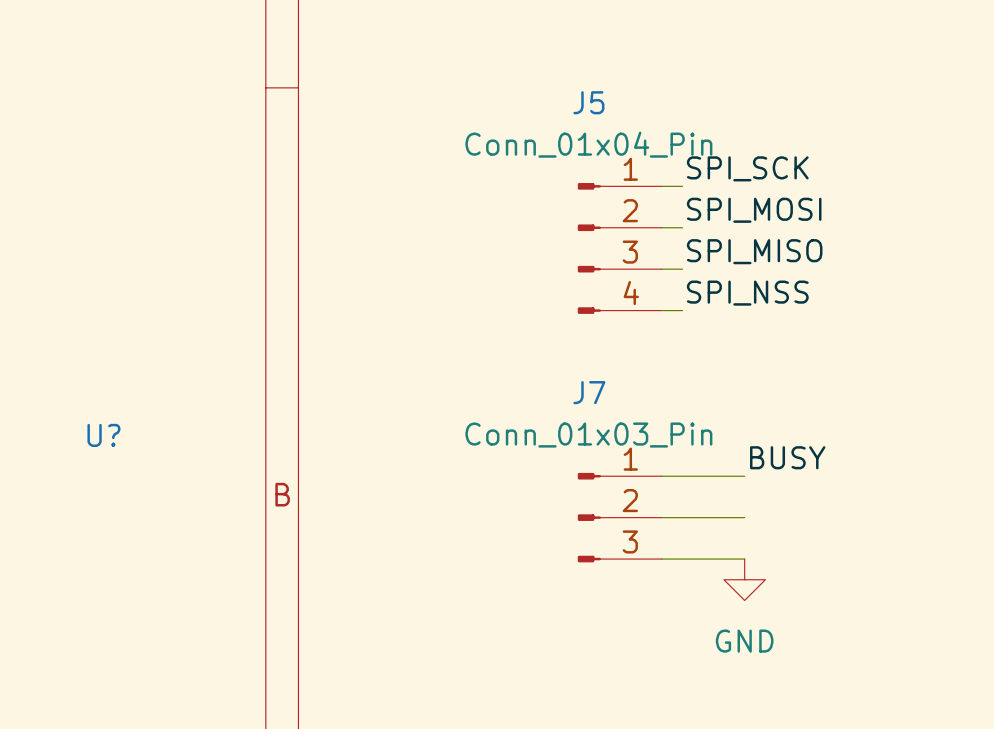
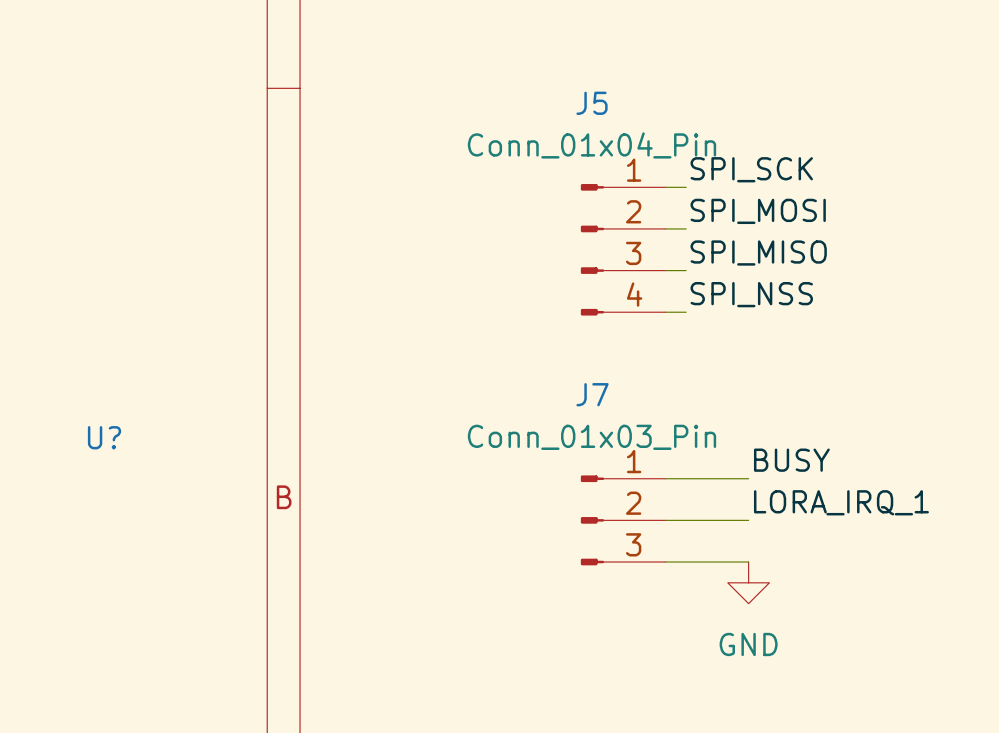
label: none -> LORA_IRQ_1 (841, 502)

